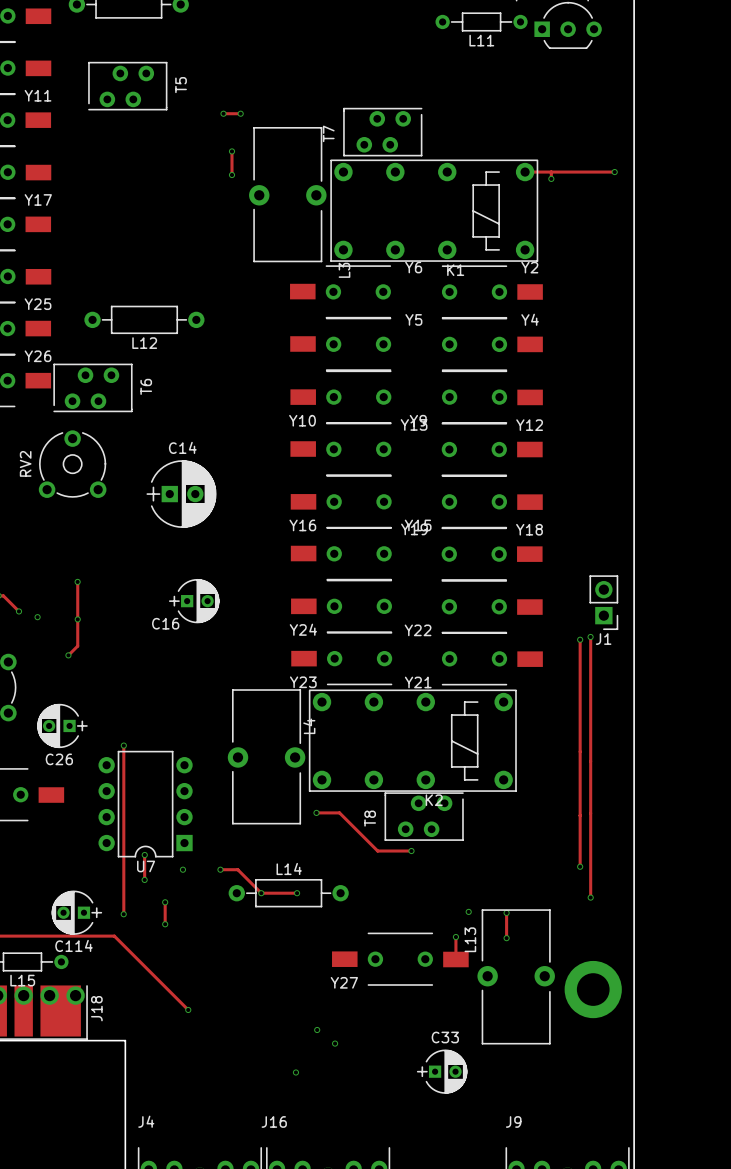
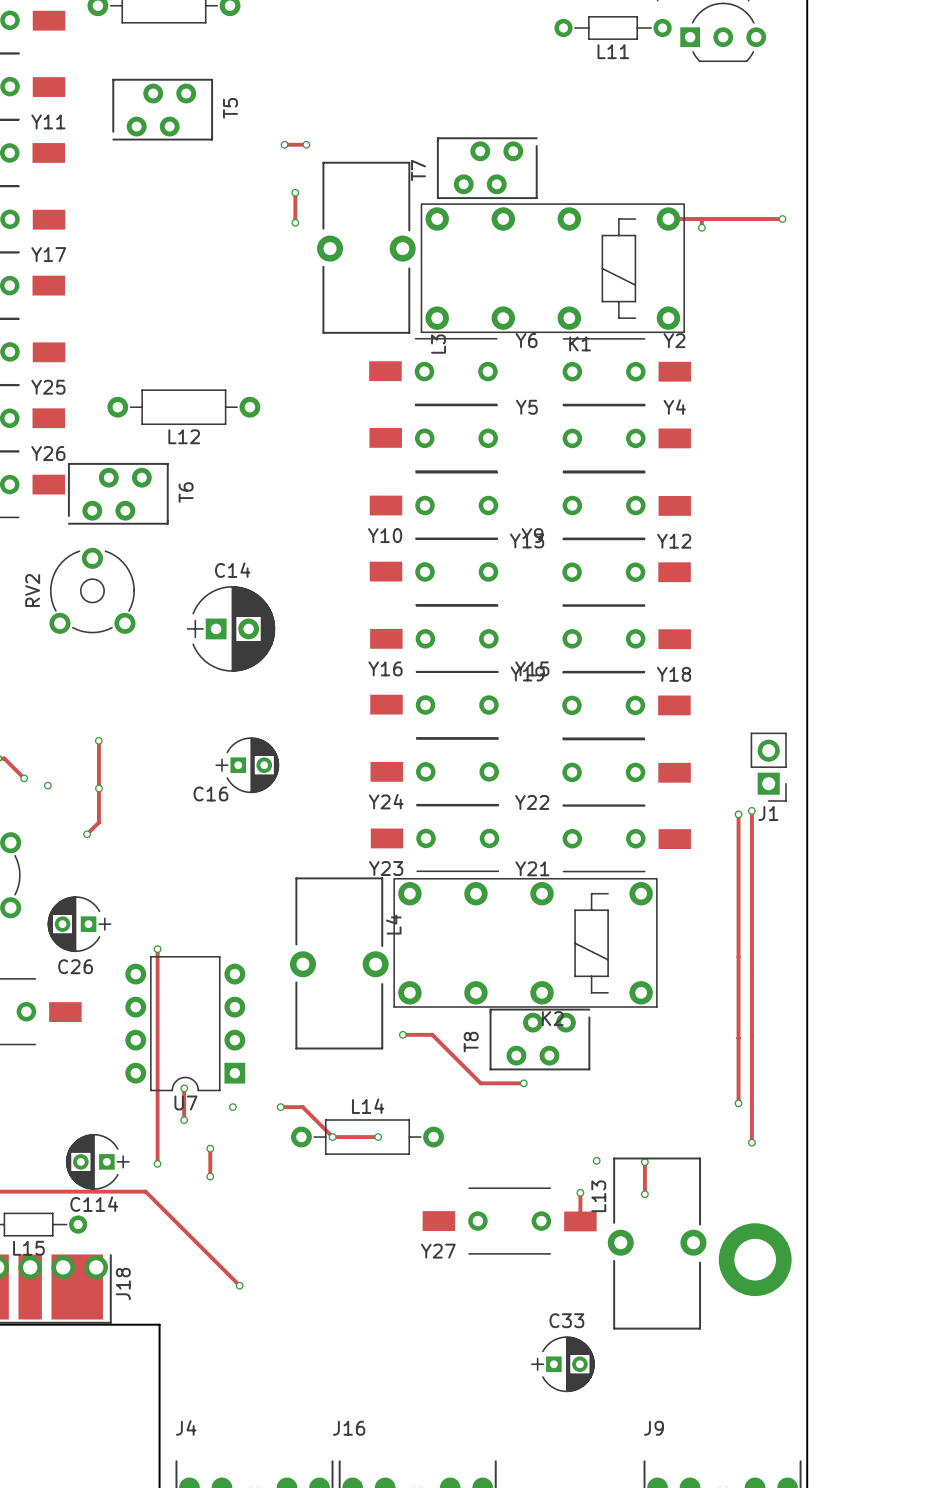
via: (317, 1030) -> none
via: (335, 1043) -> none
via: (295, 1072) -> none

